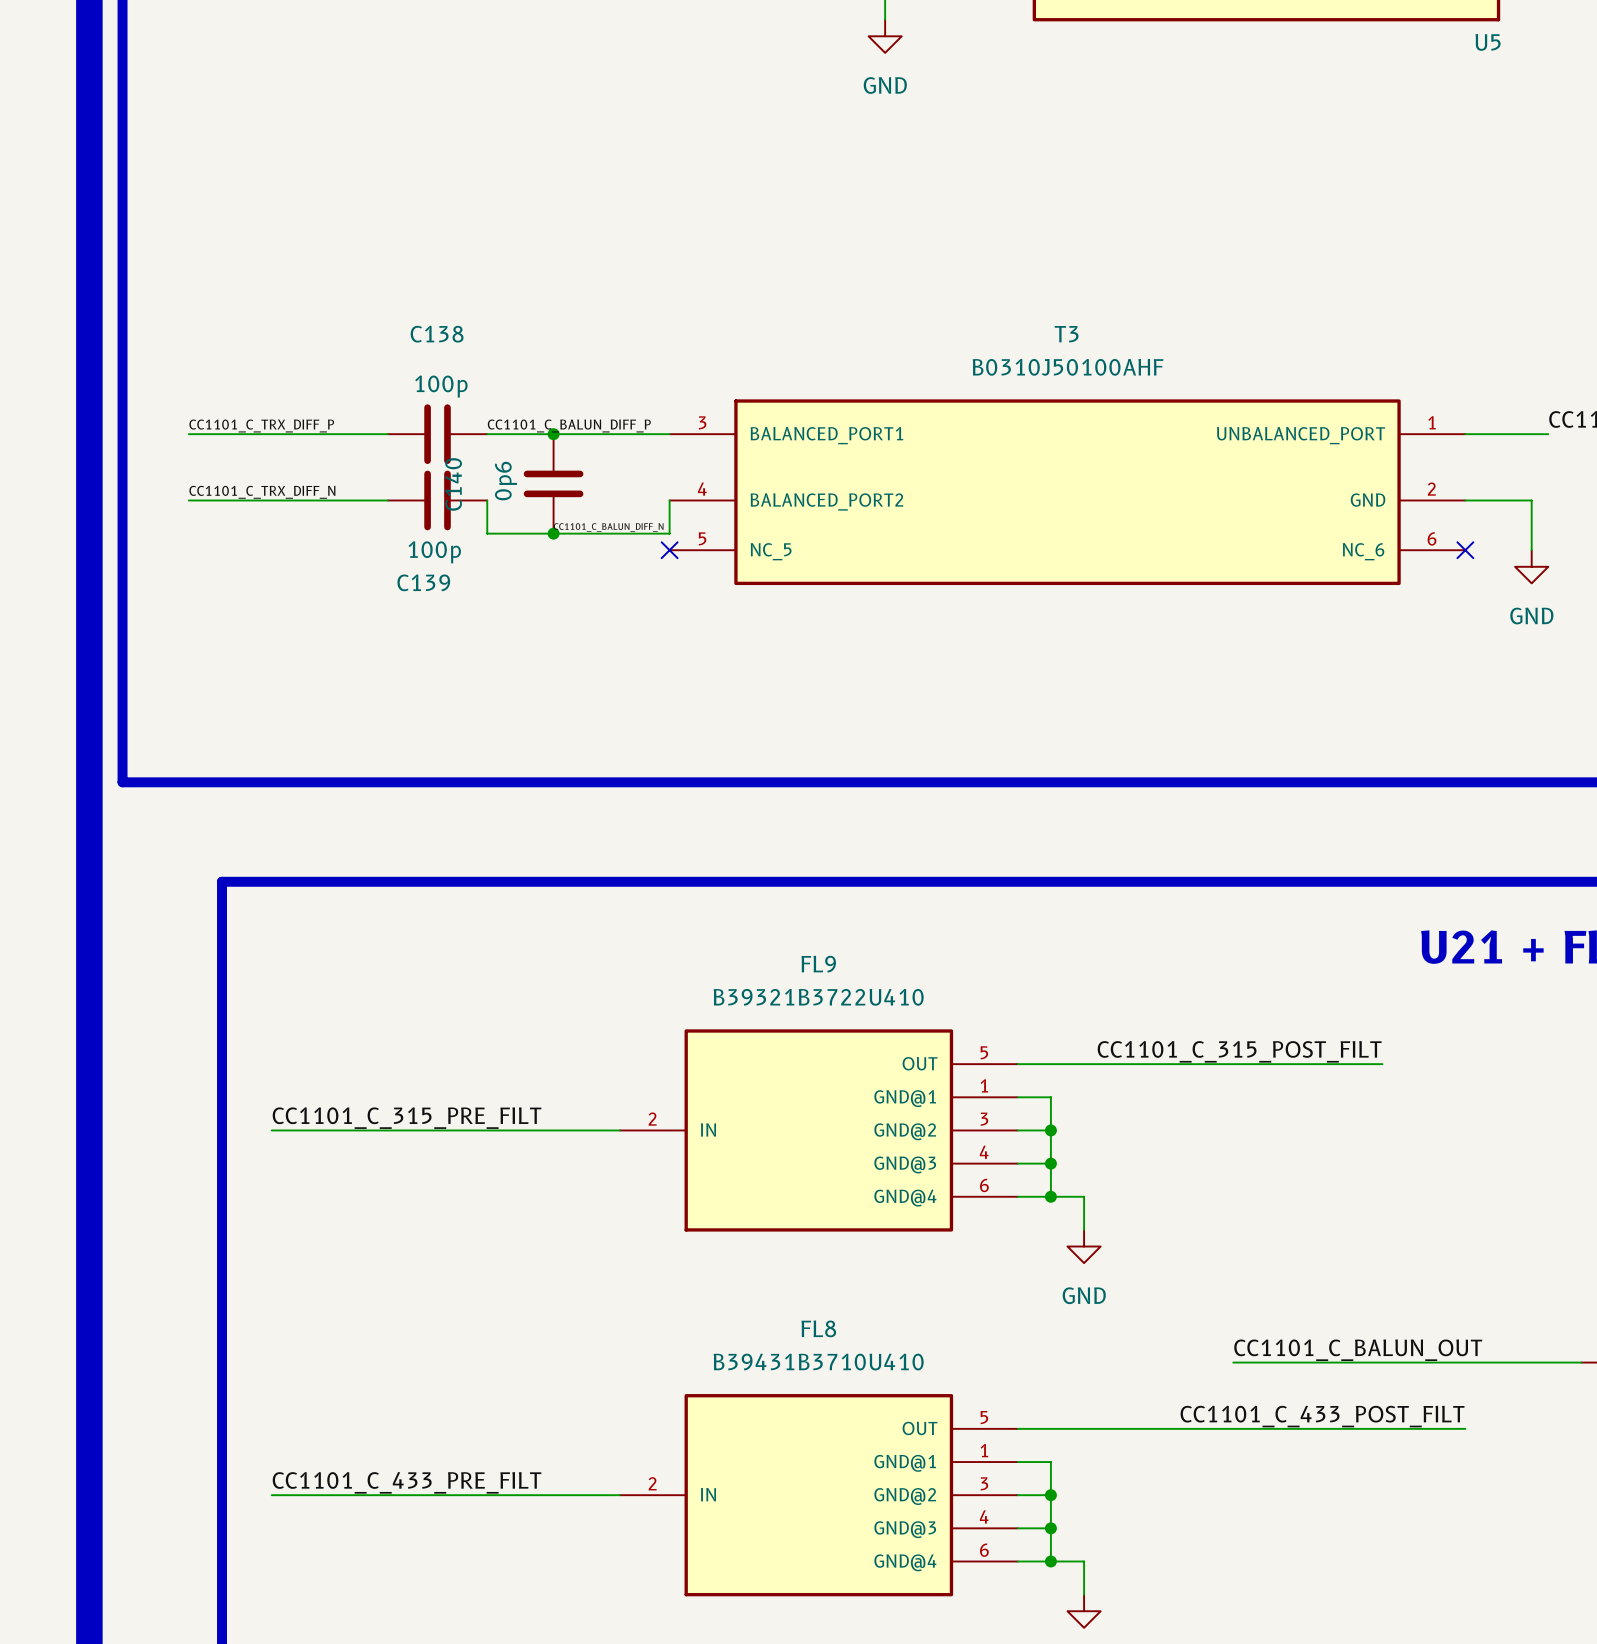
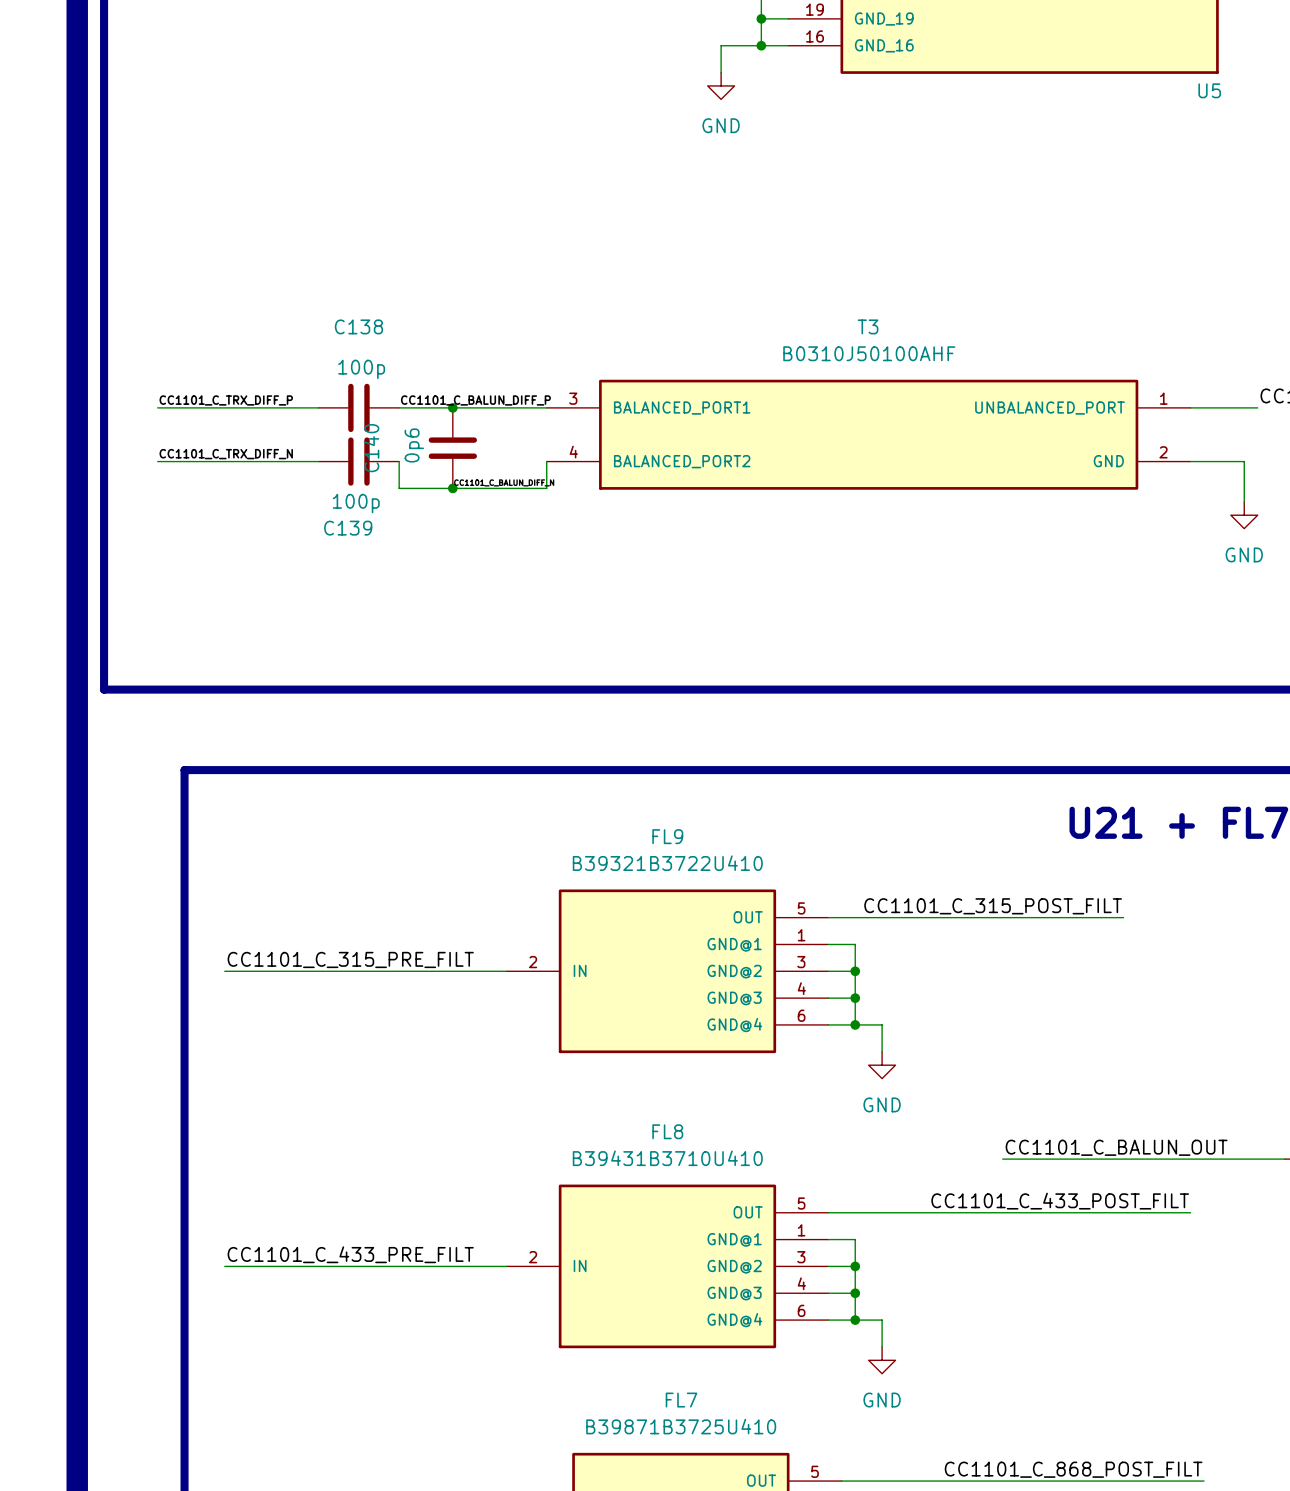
T3 symbol: [669, 399, 1466, 586] -> [546, 379, 1191, 490]
no-connect mark: (669, 550) -> none
no-connect mark: (1465, 550) -> none

